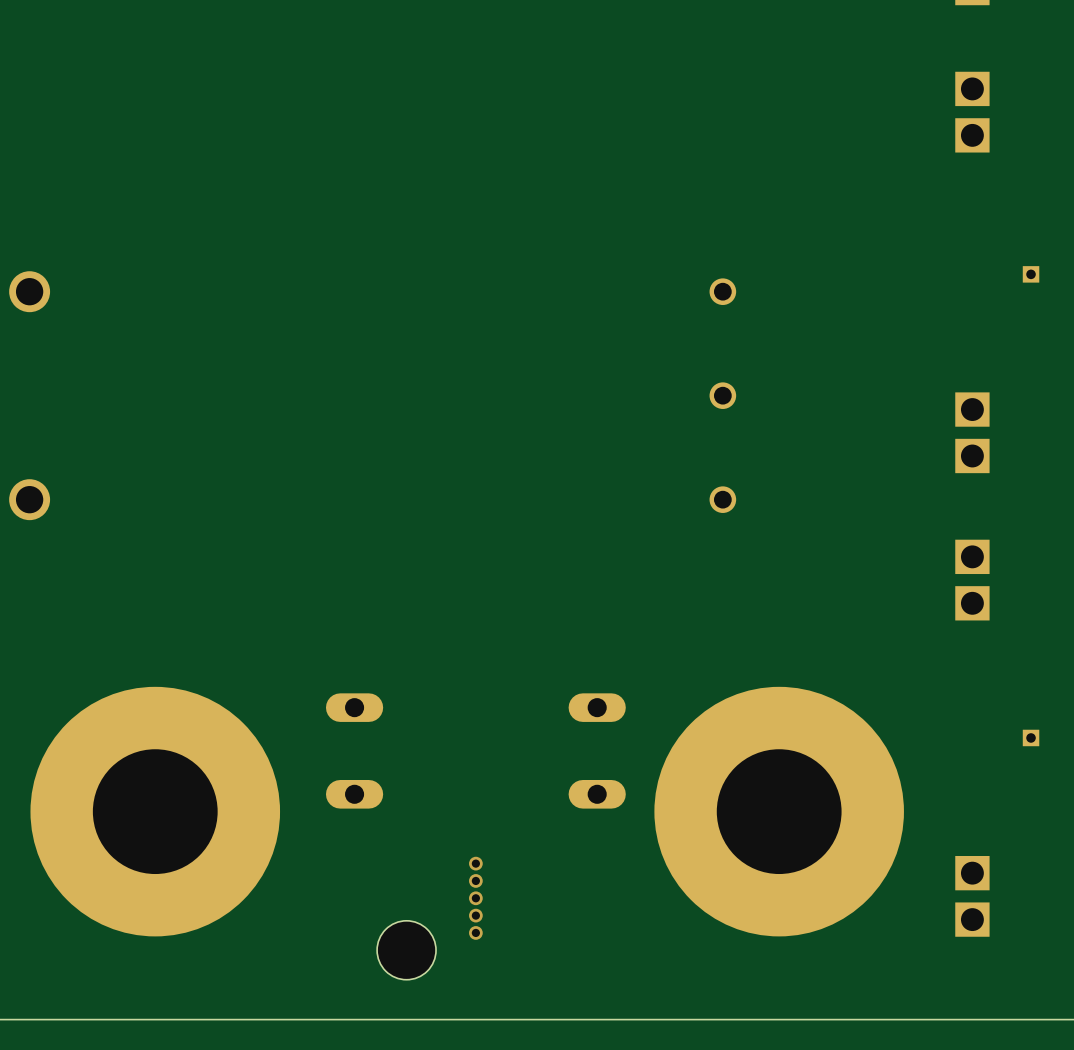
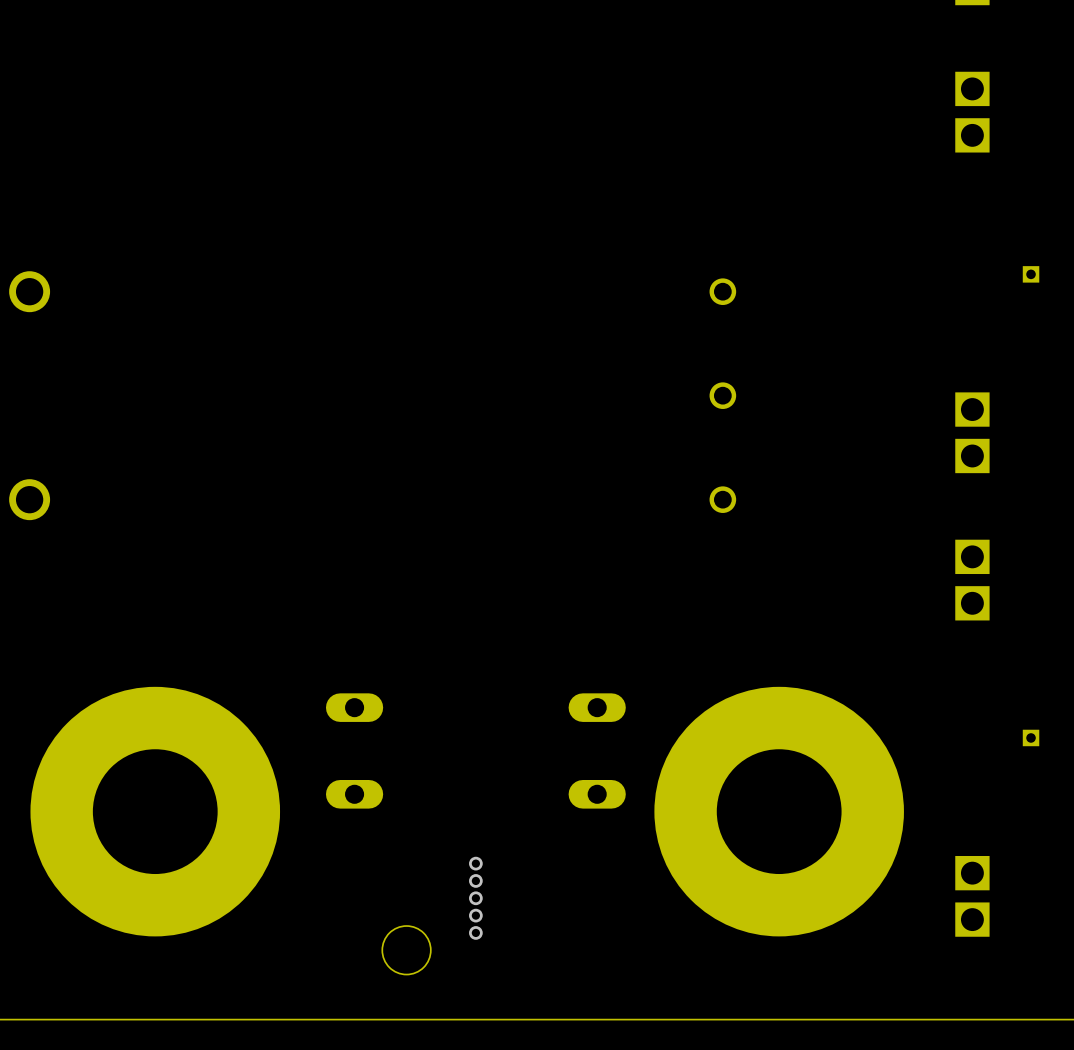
drawing: none -> [382, 925, 431, 975]
part: (406, 950) -> none

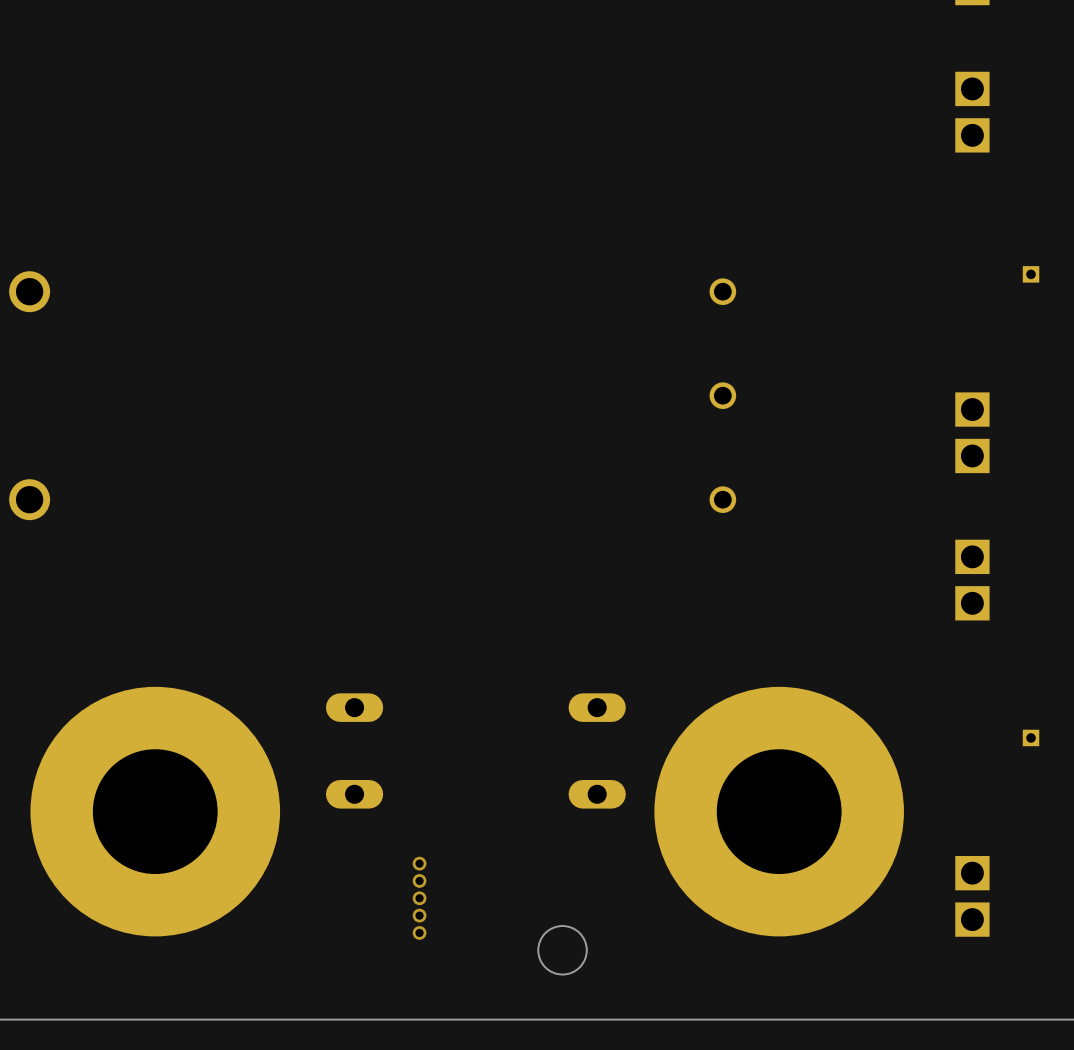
via: none -> (419, 863)
via: (475, 863) -> none
via: none -> (419, 880)
via: (475, 880) -> none
via: none -> (419, 898)
via: (475, 898) -> none
via: none -> (419, 915)
via: (475, 915) -> none
via: none -> (419, 932)
via: (475, 932) -> none
drawing position: (406, 950) -> (562, 950)

